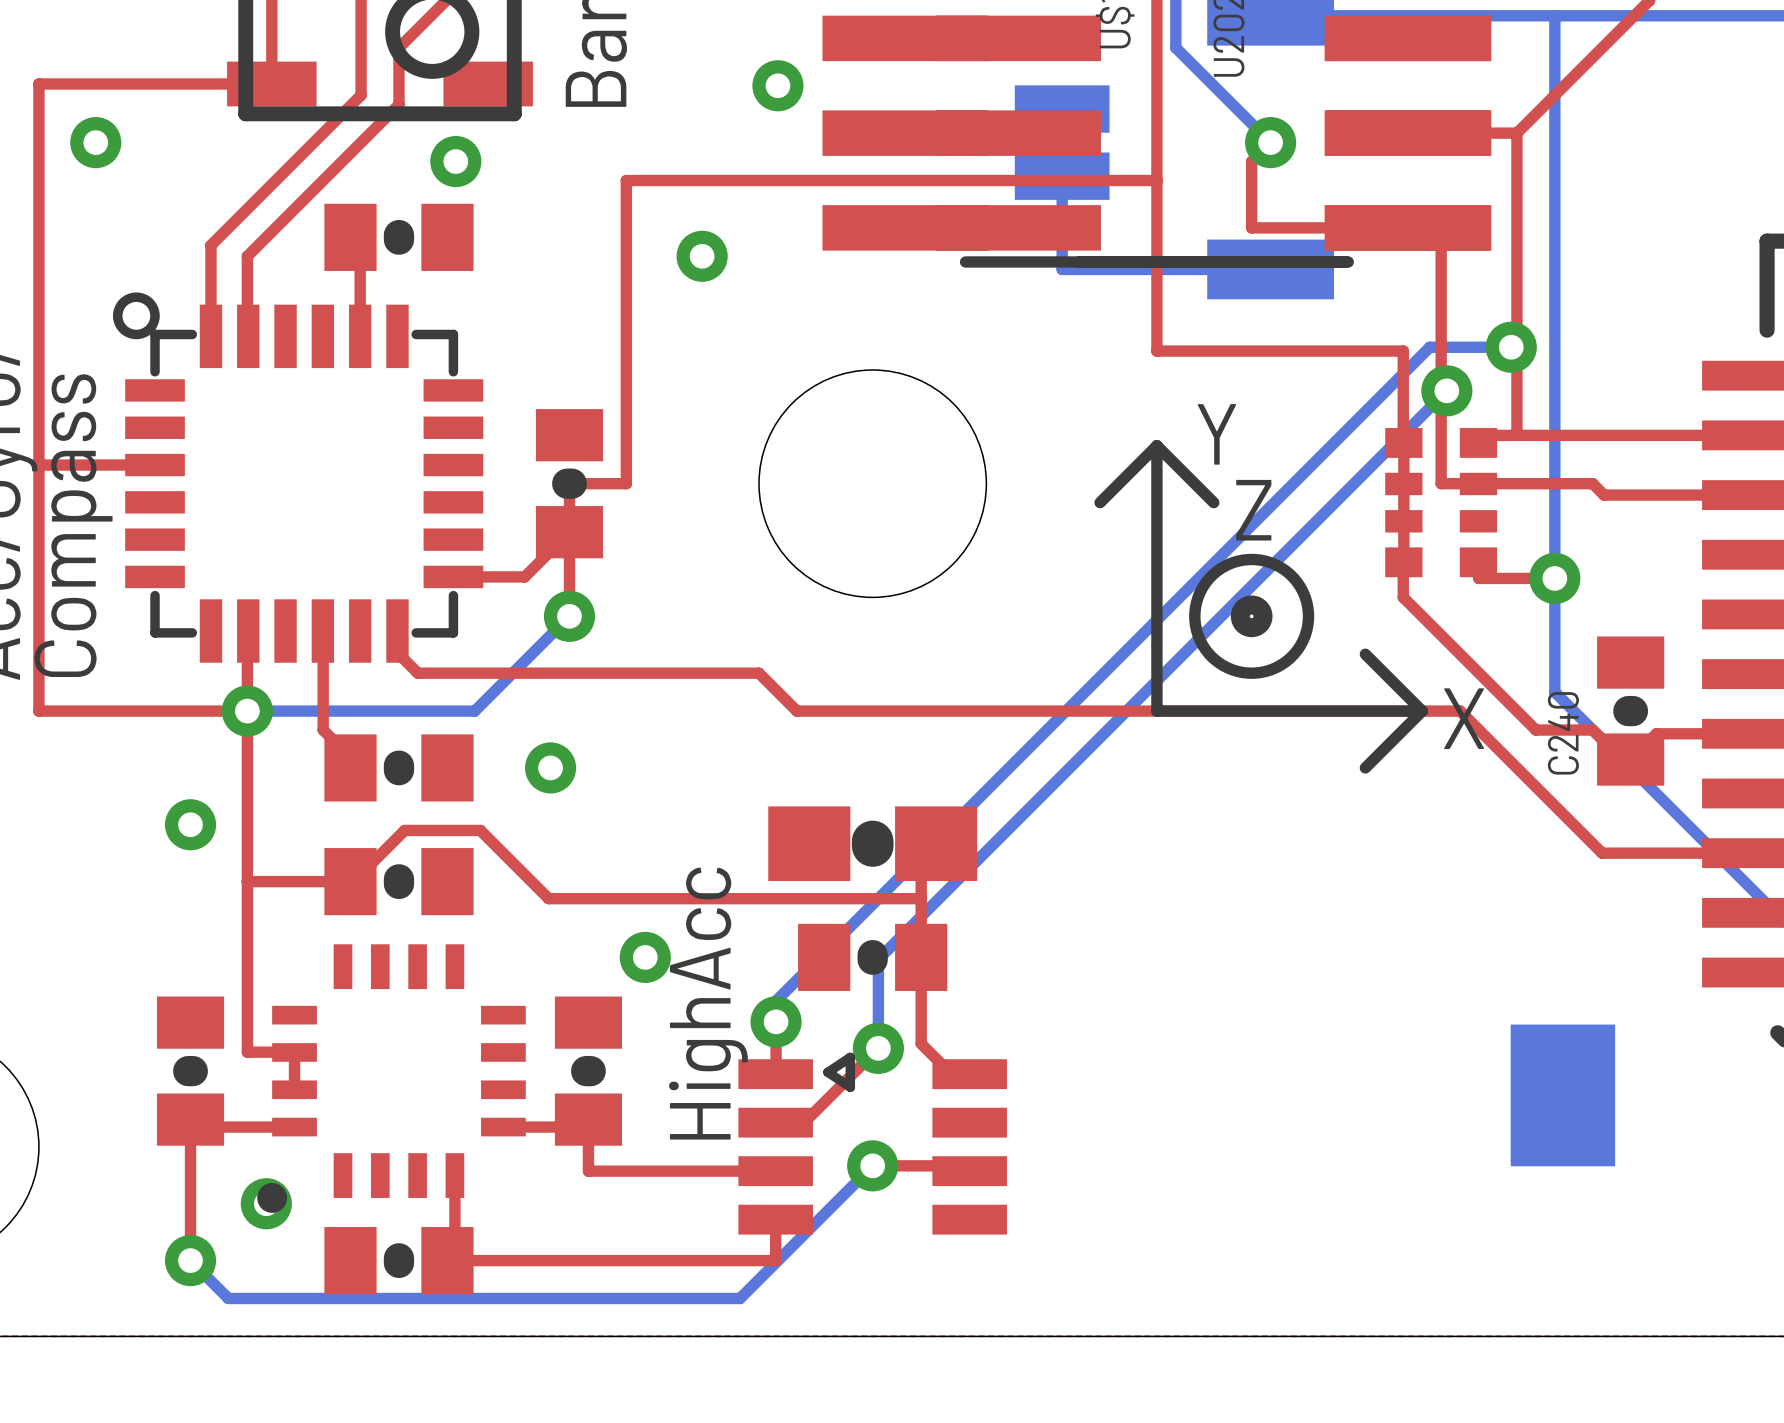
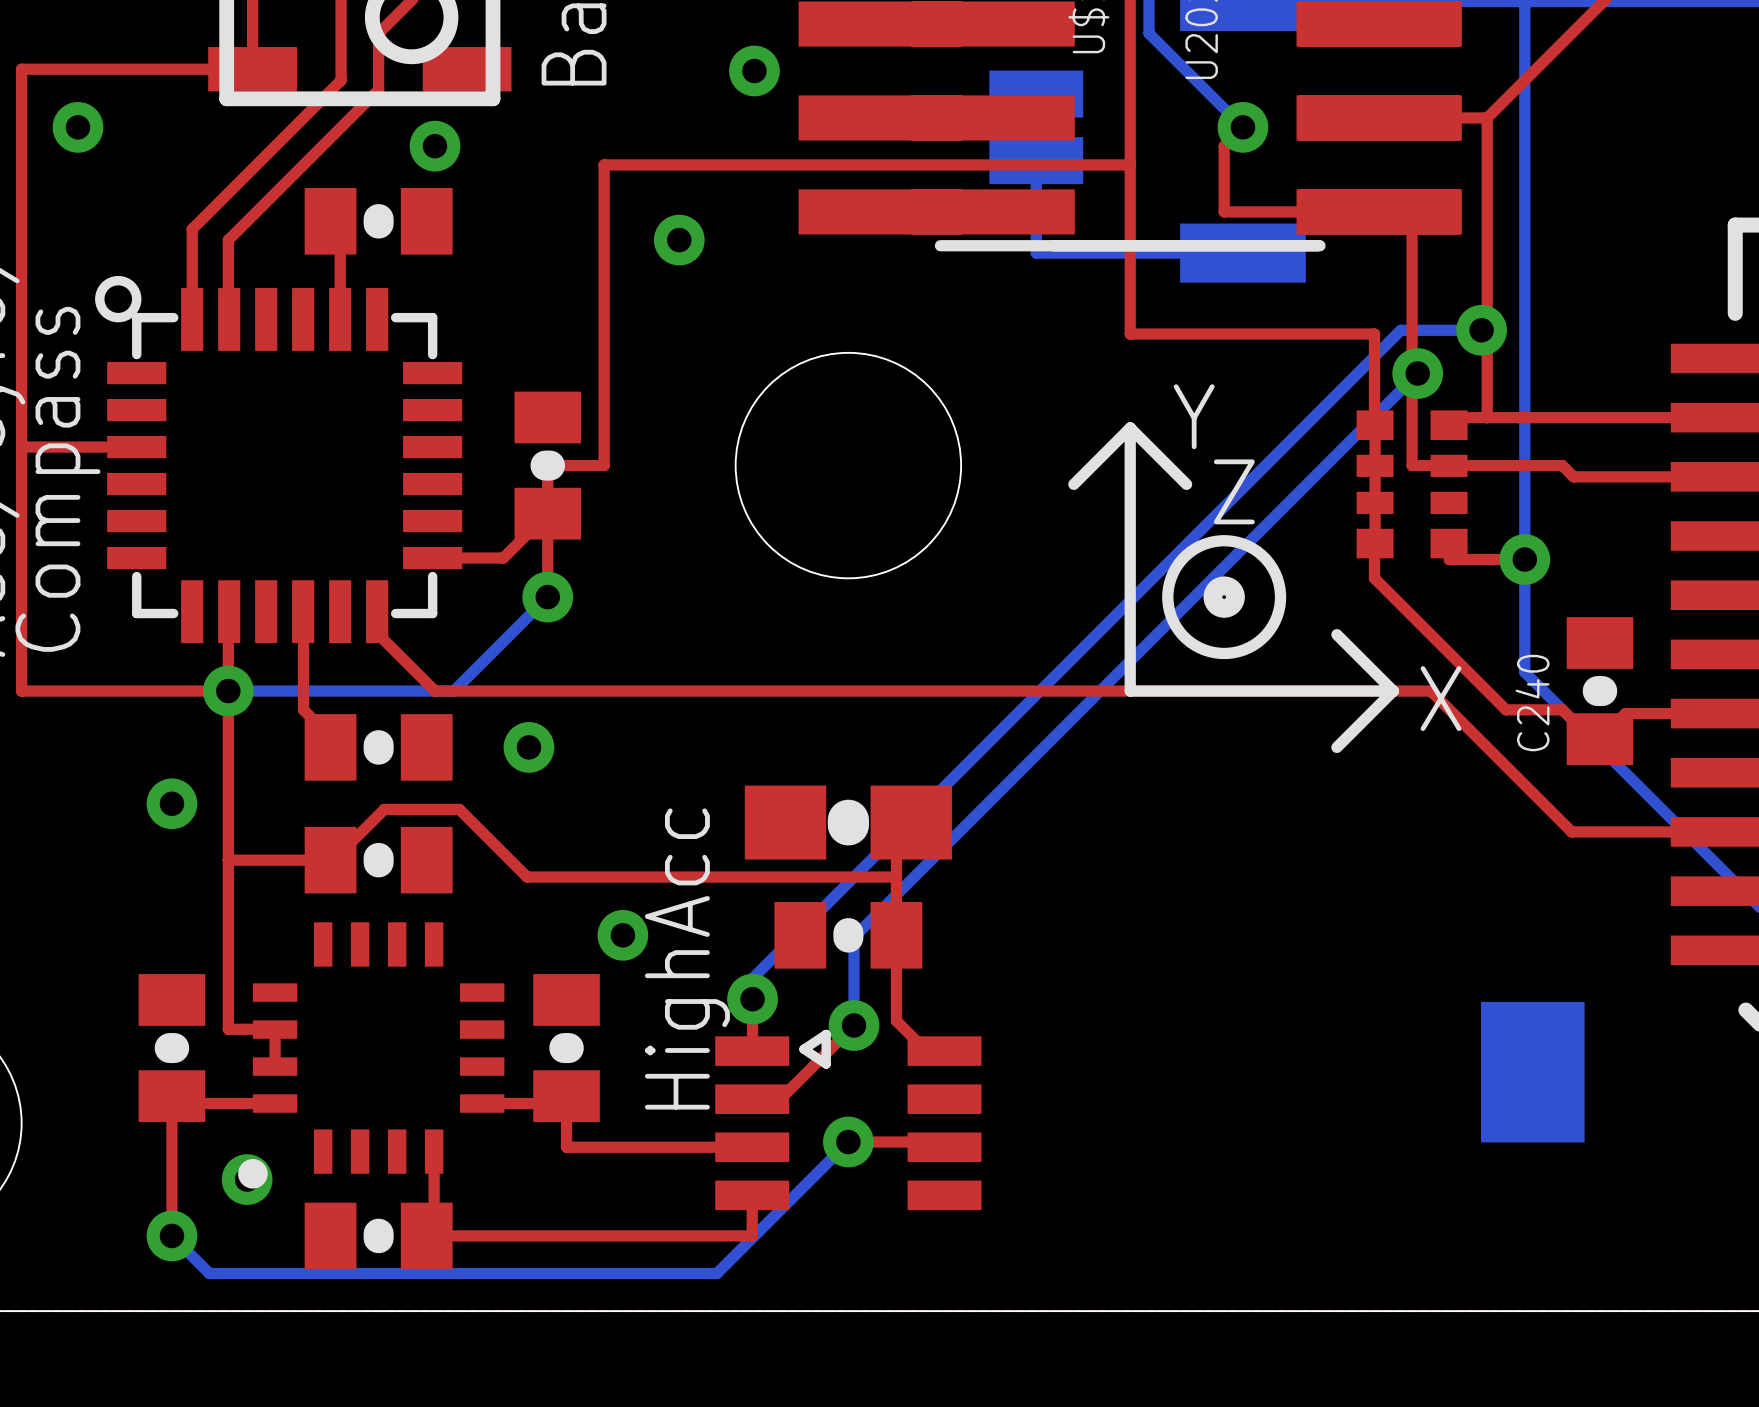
top track: (417, 673) (758, 673) (796, 711) -> (397, 653) (435, 691) (773, 691)

